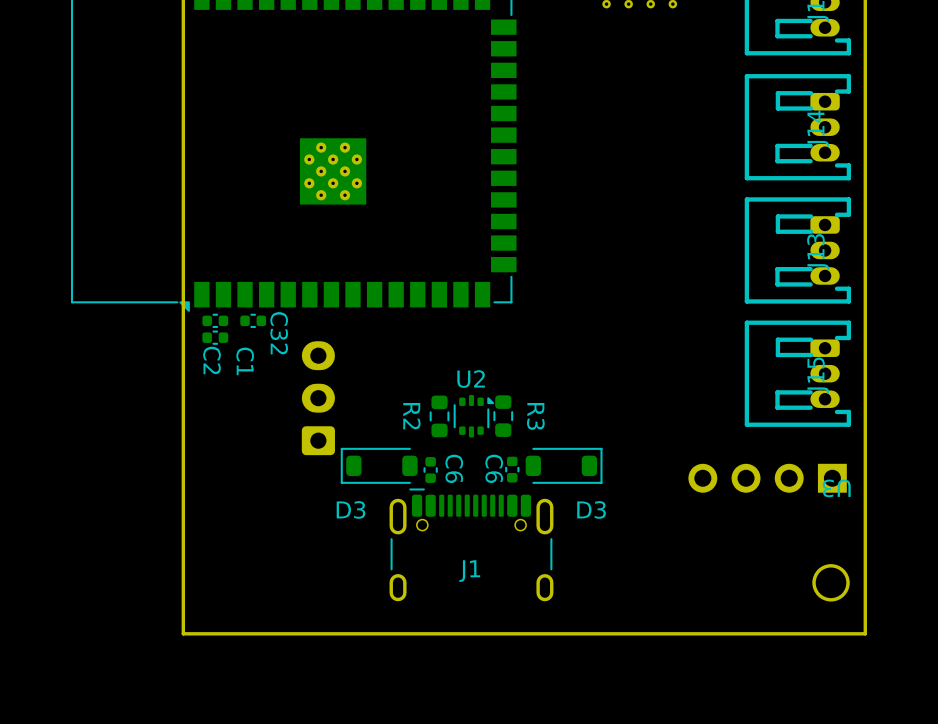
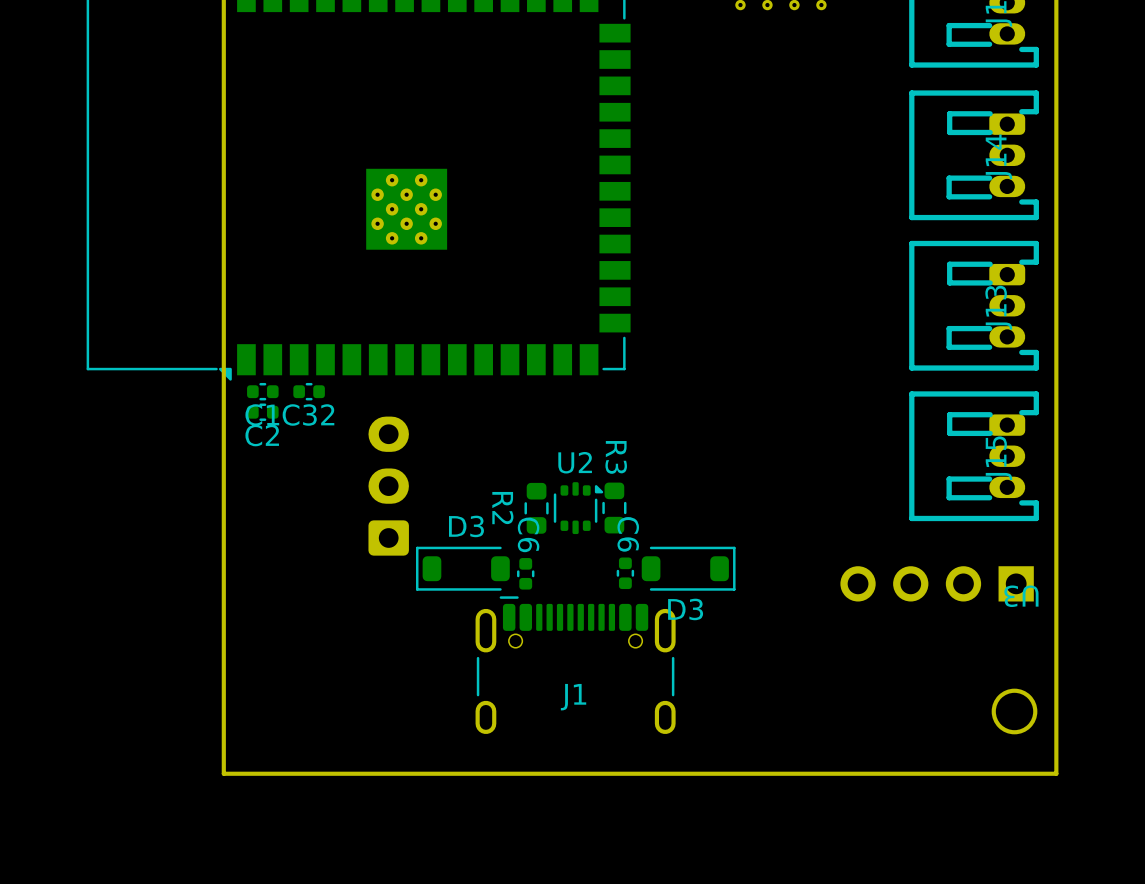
C32 name rotation: 0° (279, 333) -> 90° counterclockwise (308, 414)
C2 name rotation: 0° (212, 360) -> 90° counterclockwise (262, 435)
C1 name rotation: 0° (245, 361) -> 90° counterclockwise (262, 414)
R3 name position: R3 (535, 416) -> R3 (616, 457)
C6 name position: C6 (454, 468) -> C6 (528, 534)
C6 name position: C6 (494, 468) -> C6 (628, 534)
D3 name position: D3 (350, 509) -> D3 (466, 526)
D3 name position: D3 (591, 509) -> D3 (685, 609)

